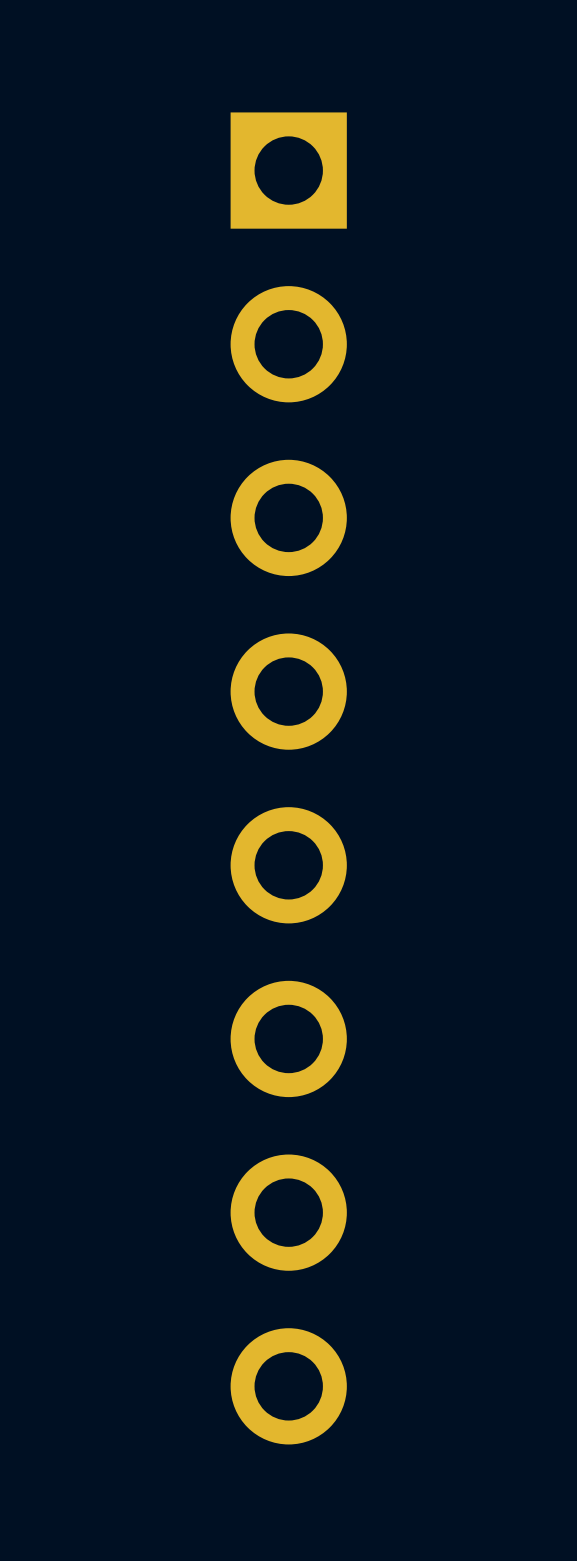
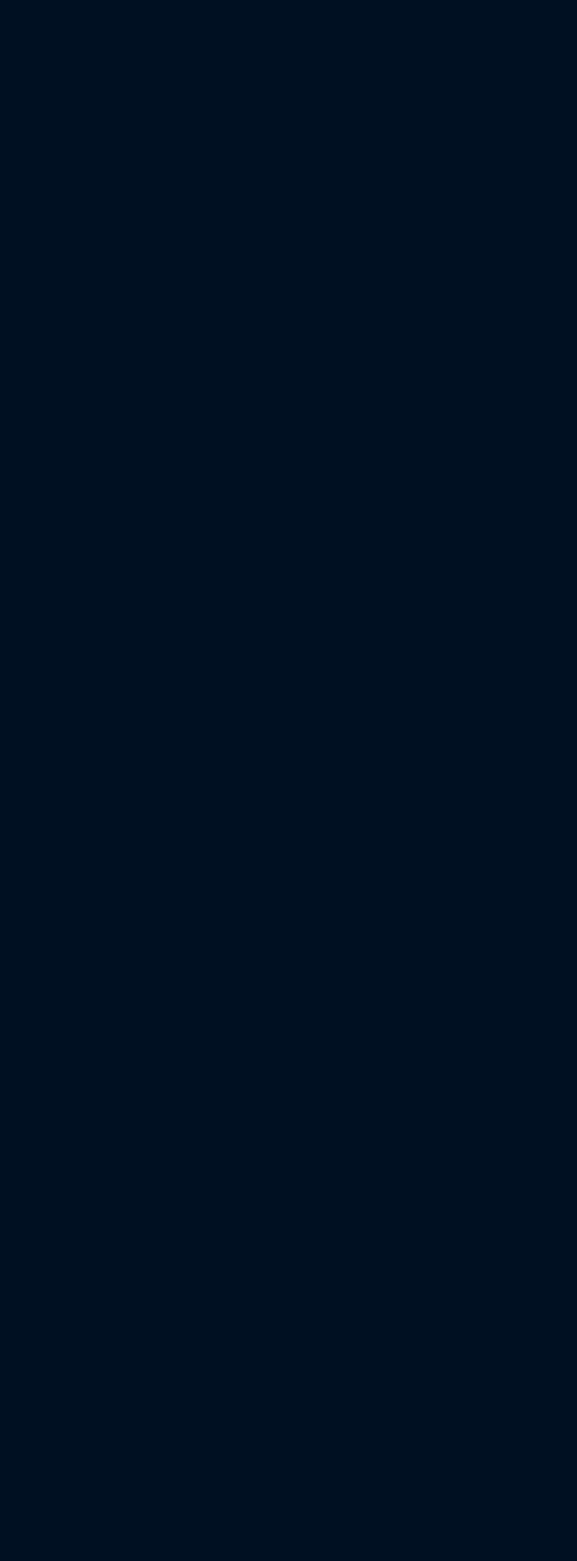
part: (288, 778) -> none

